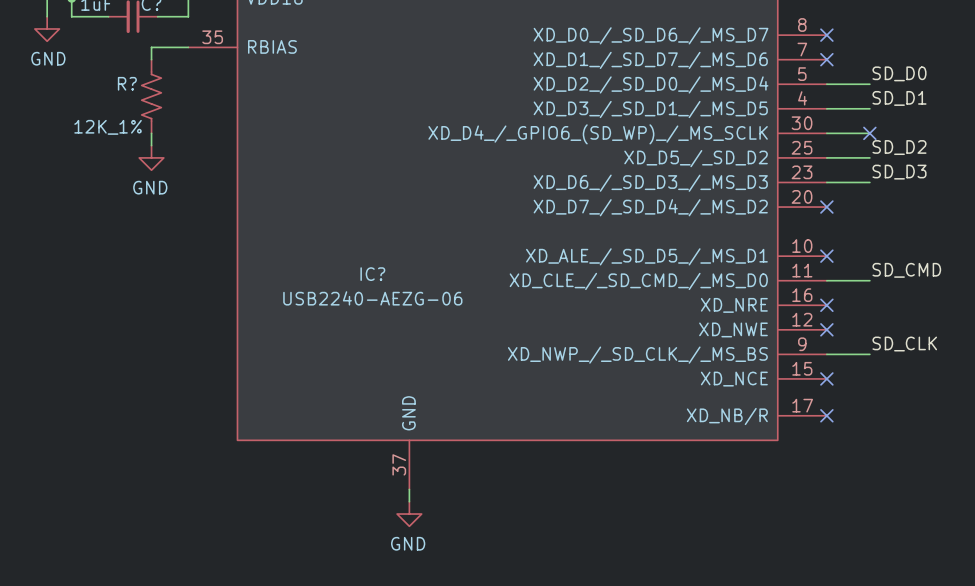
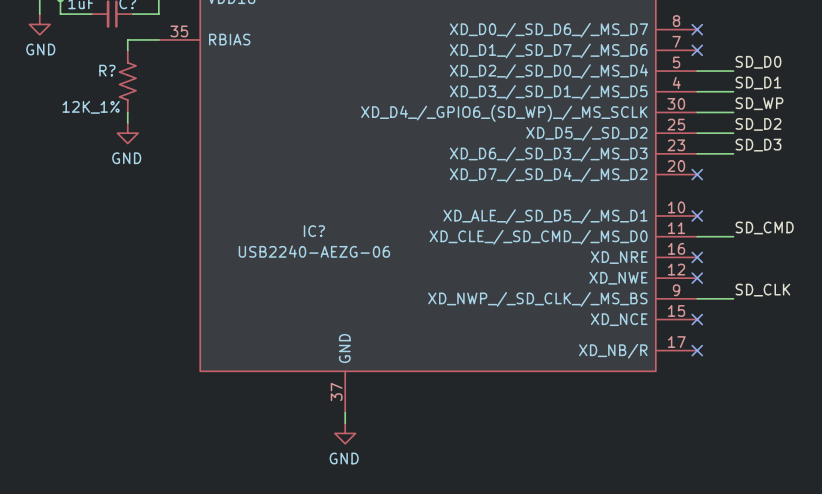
label: none -> SD_WP (759, 103)
no-connect mark: (869, 133) -> none

